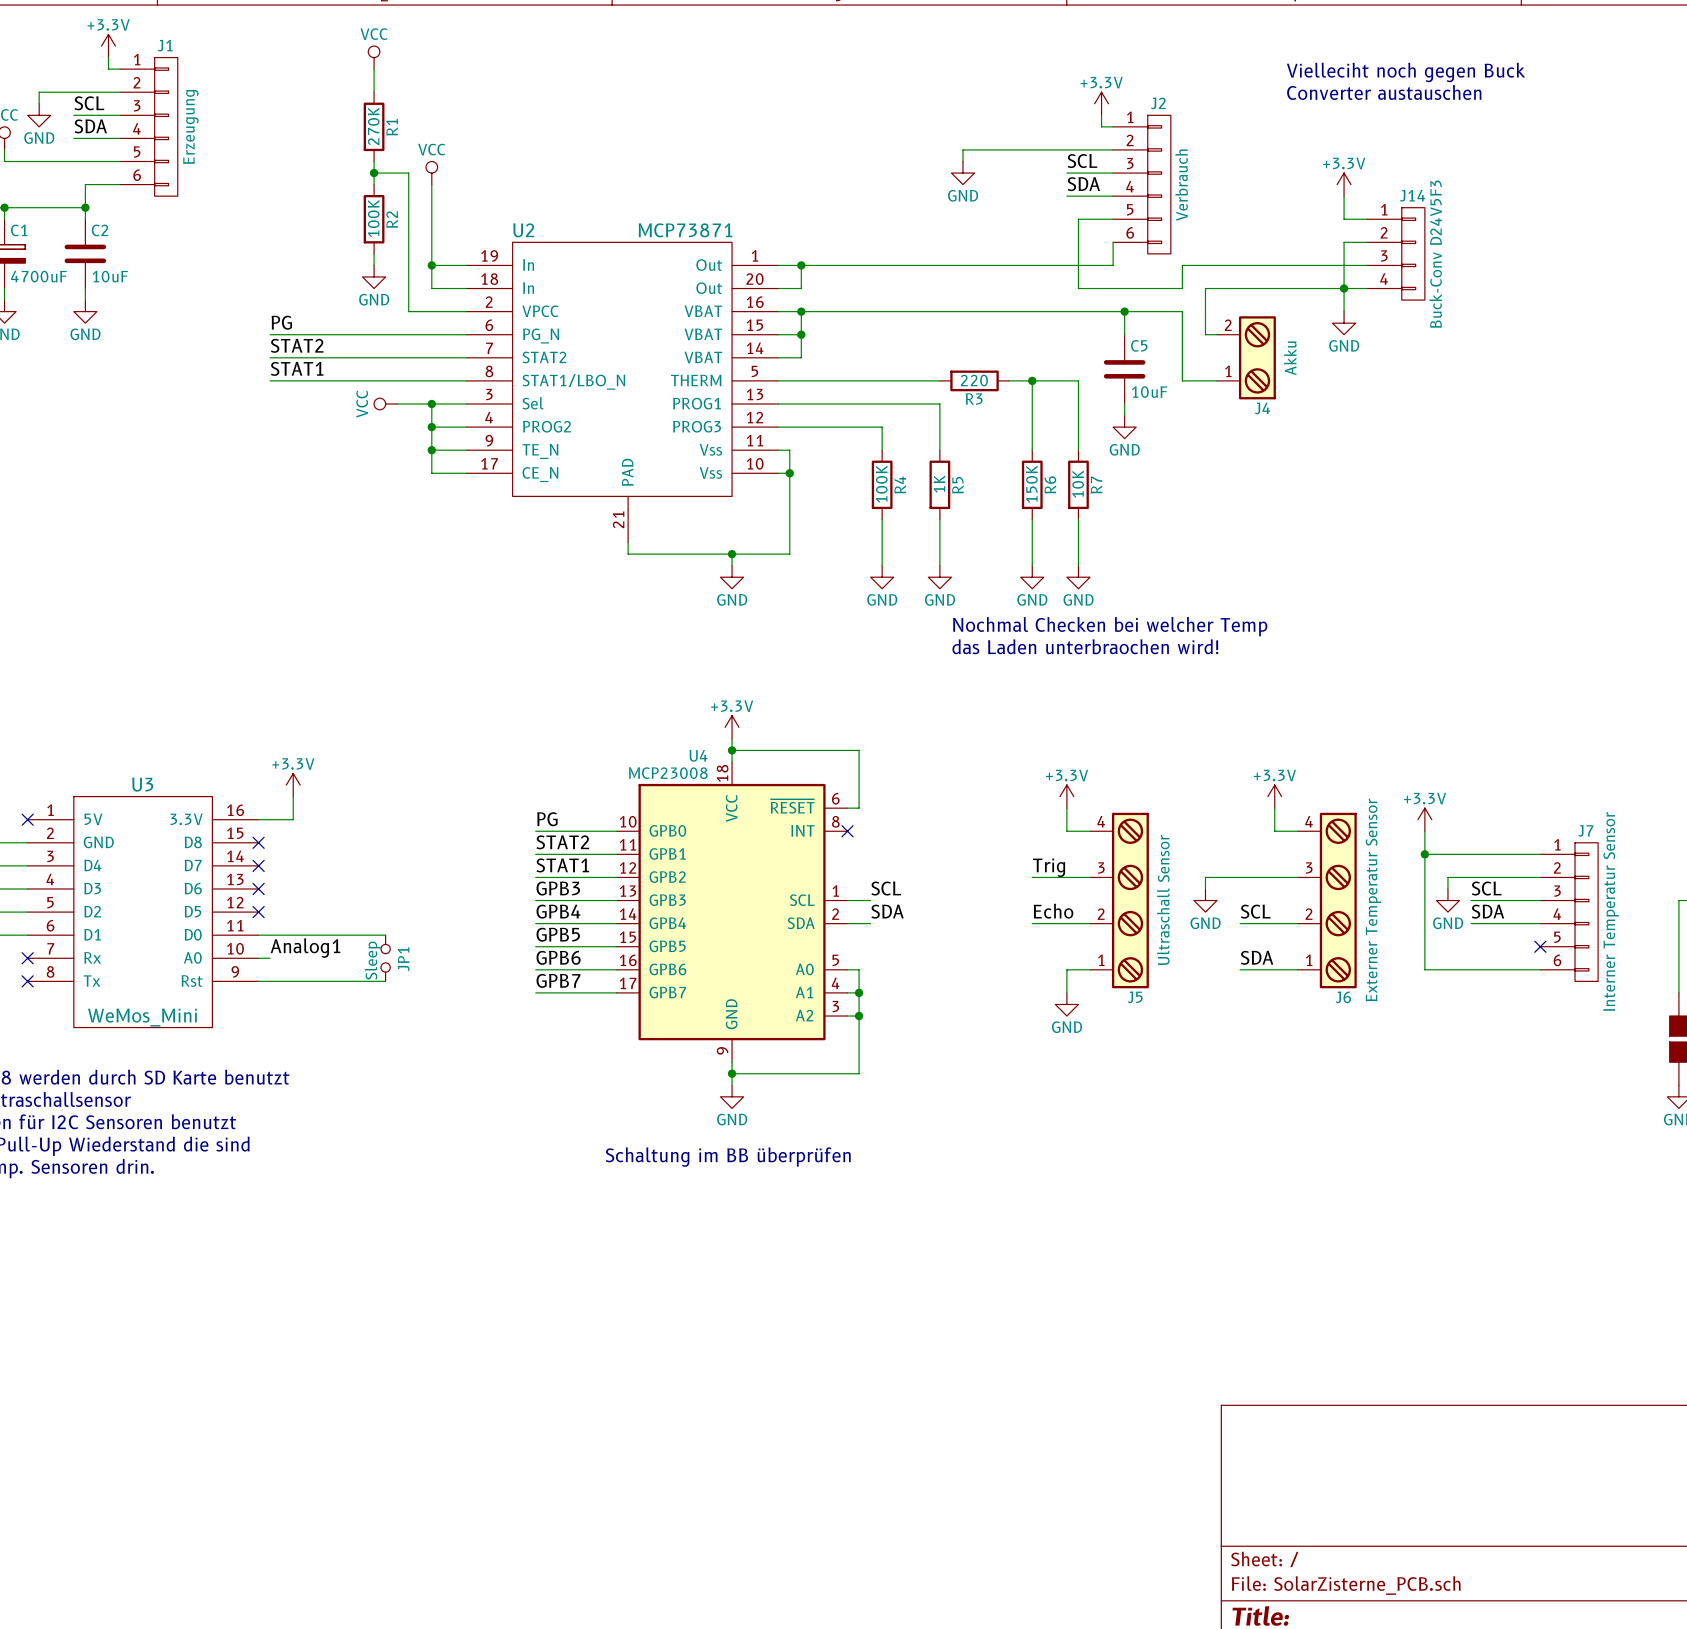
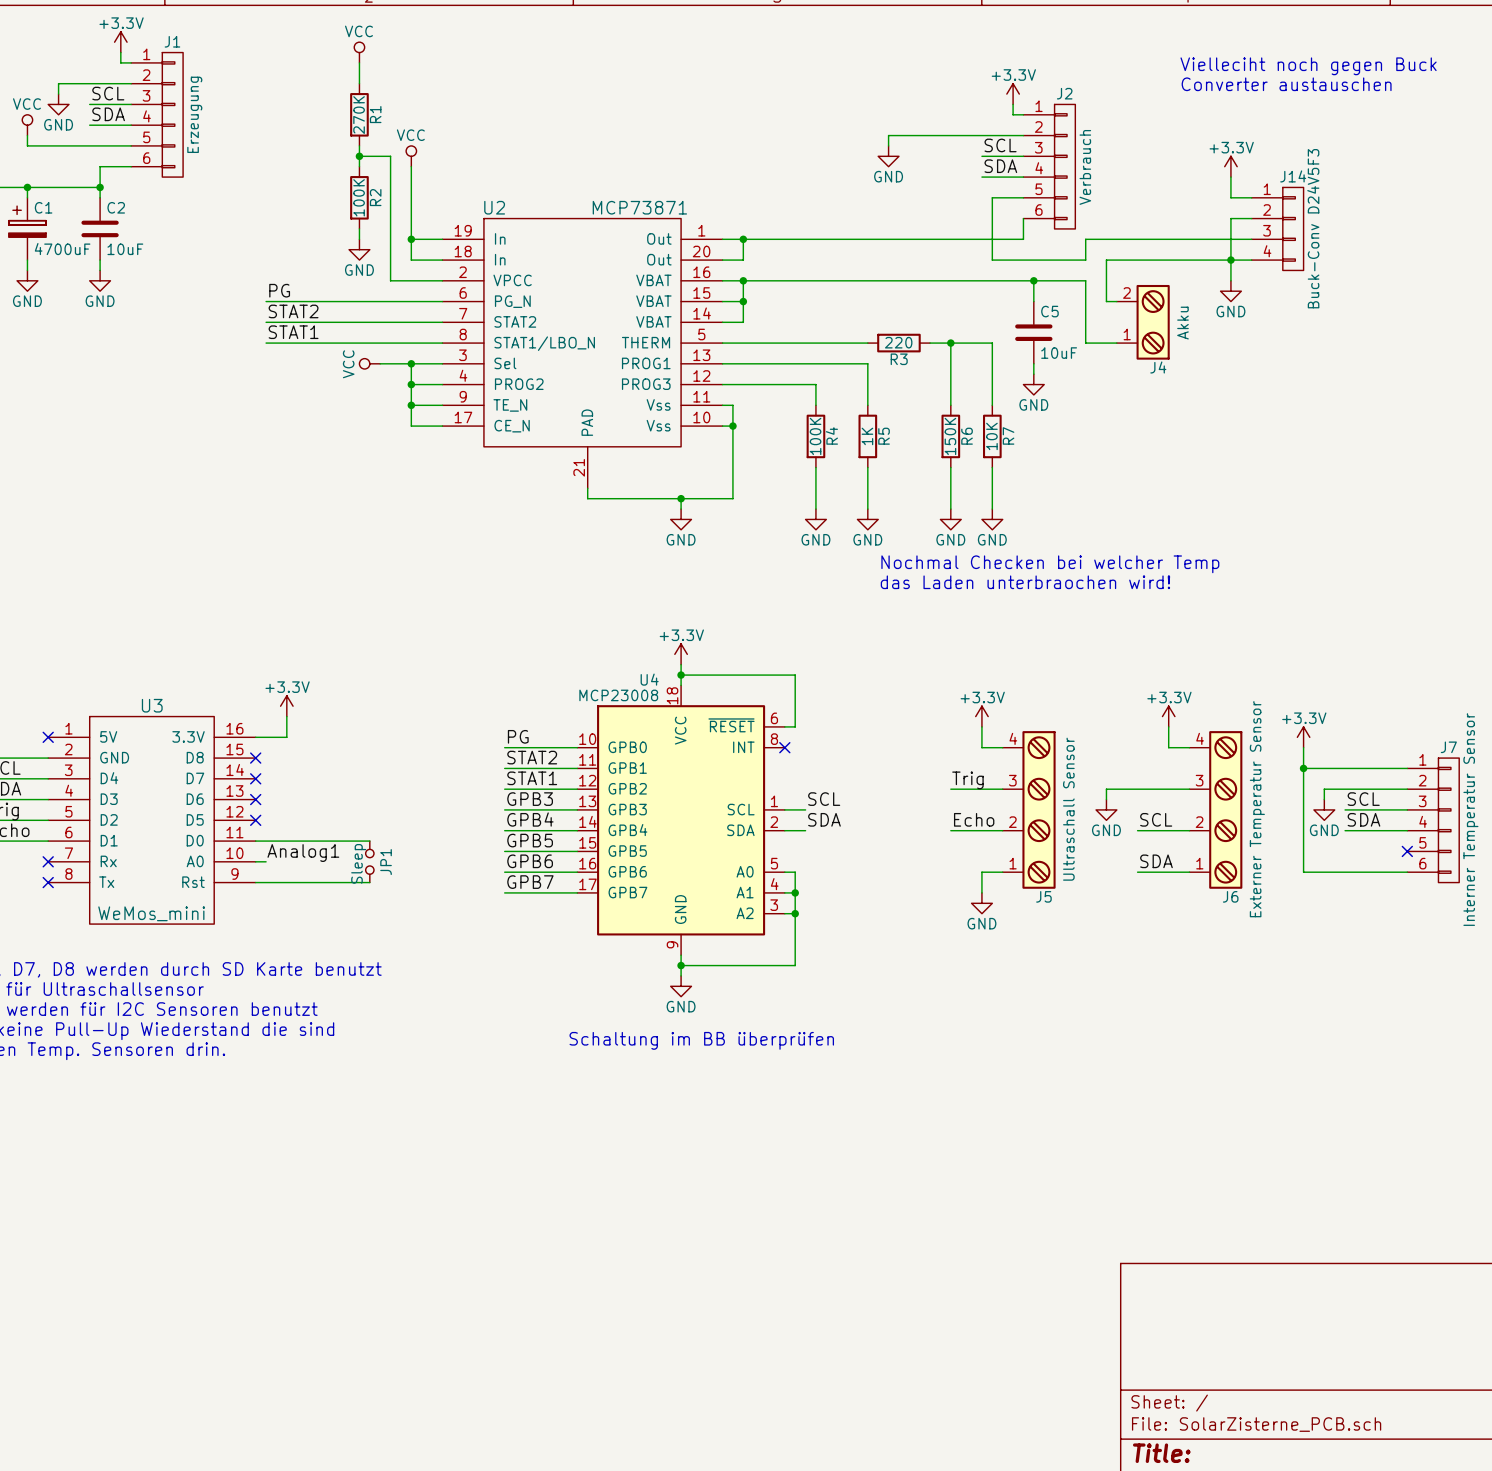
U3 value: WeMos_Mini (142, 1017) -> WeMos_mini (151, 913)

